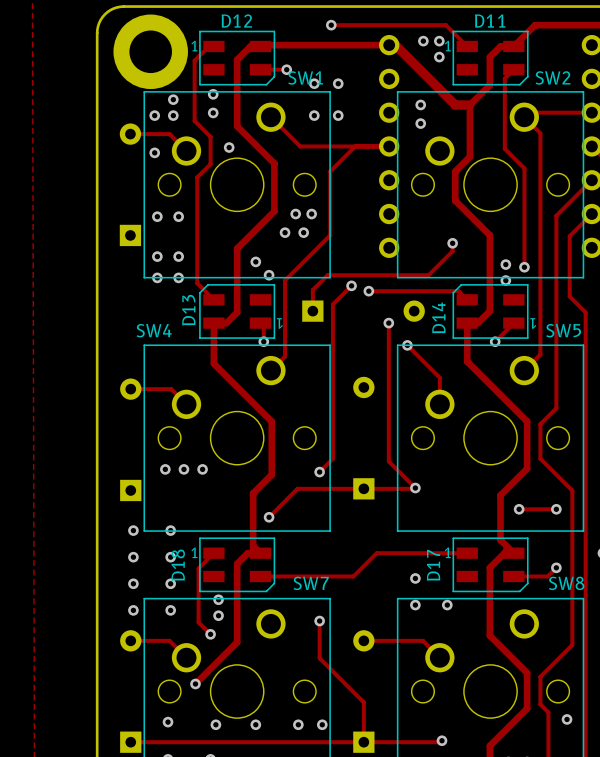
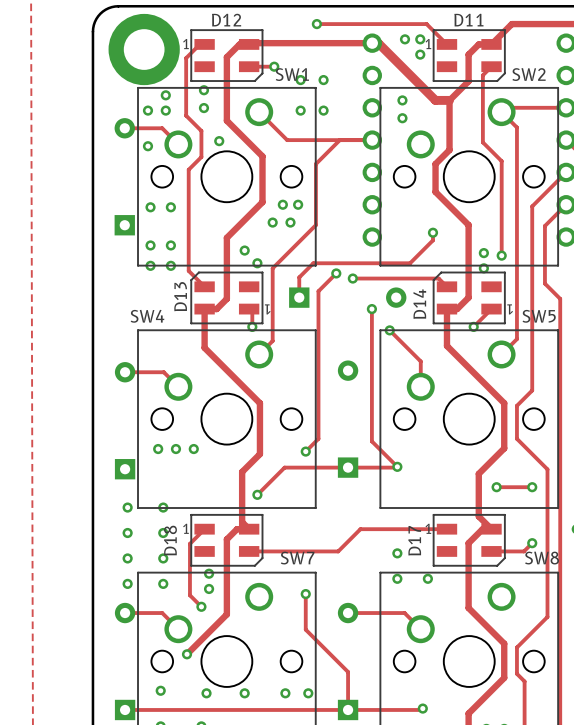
via: (567, 719) -> none

